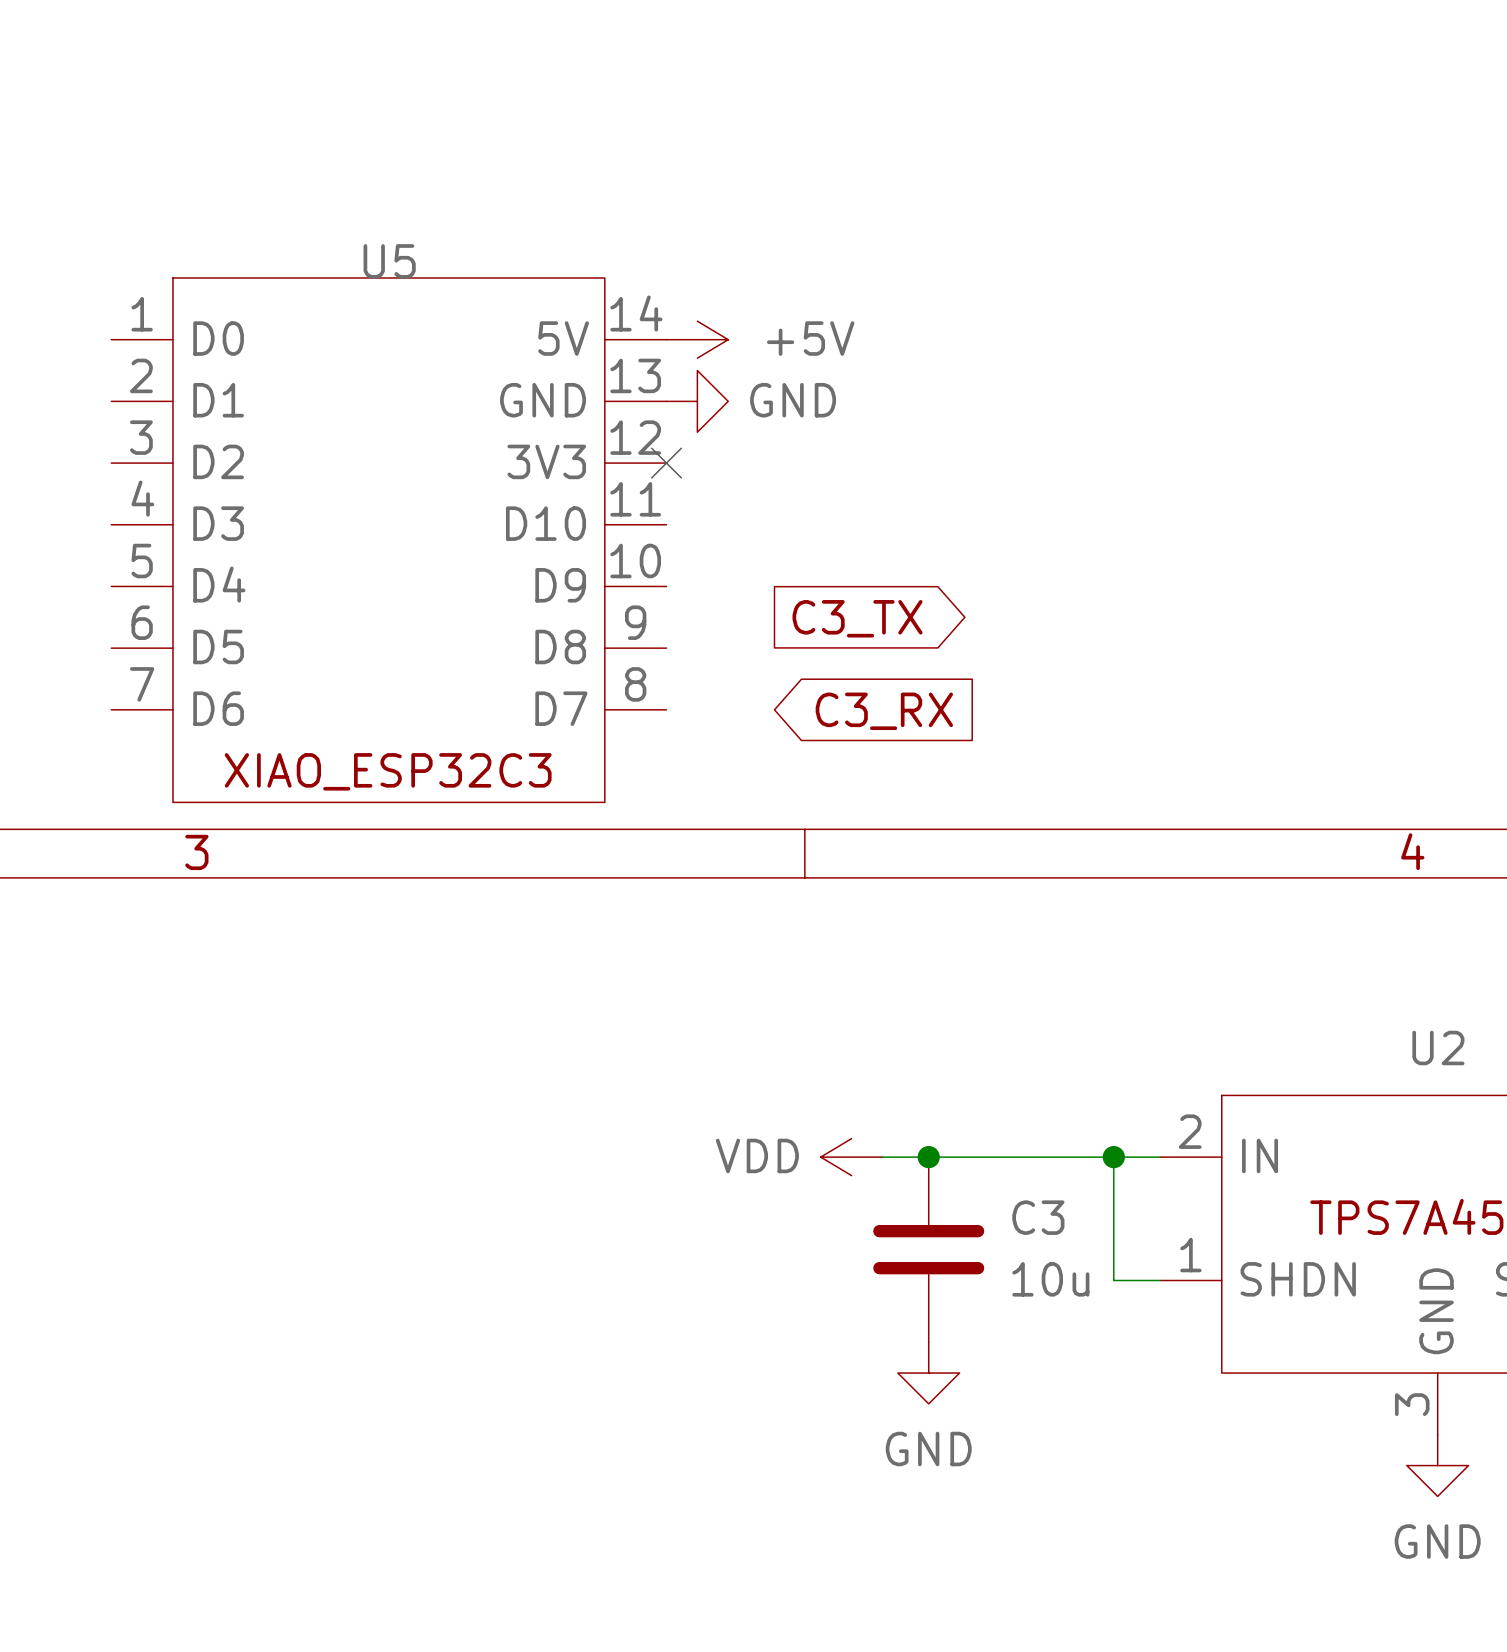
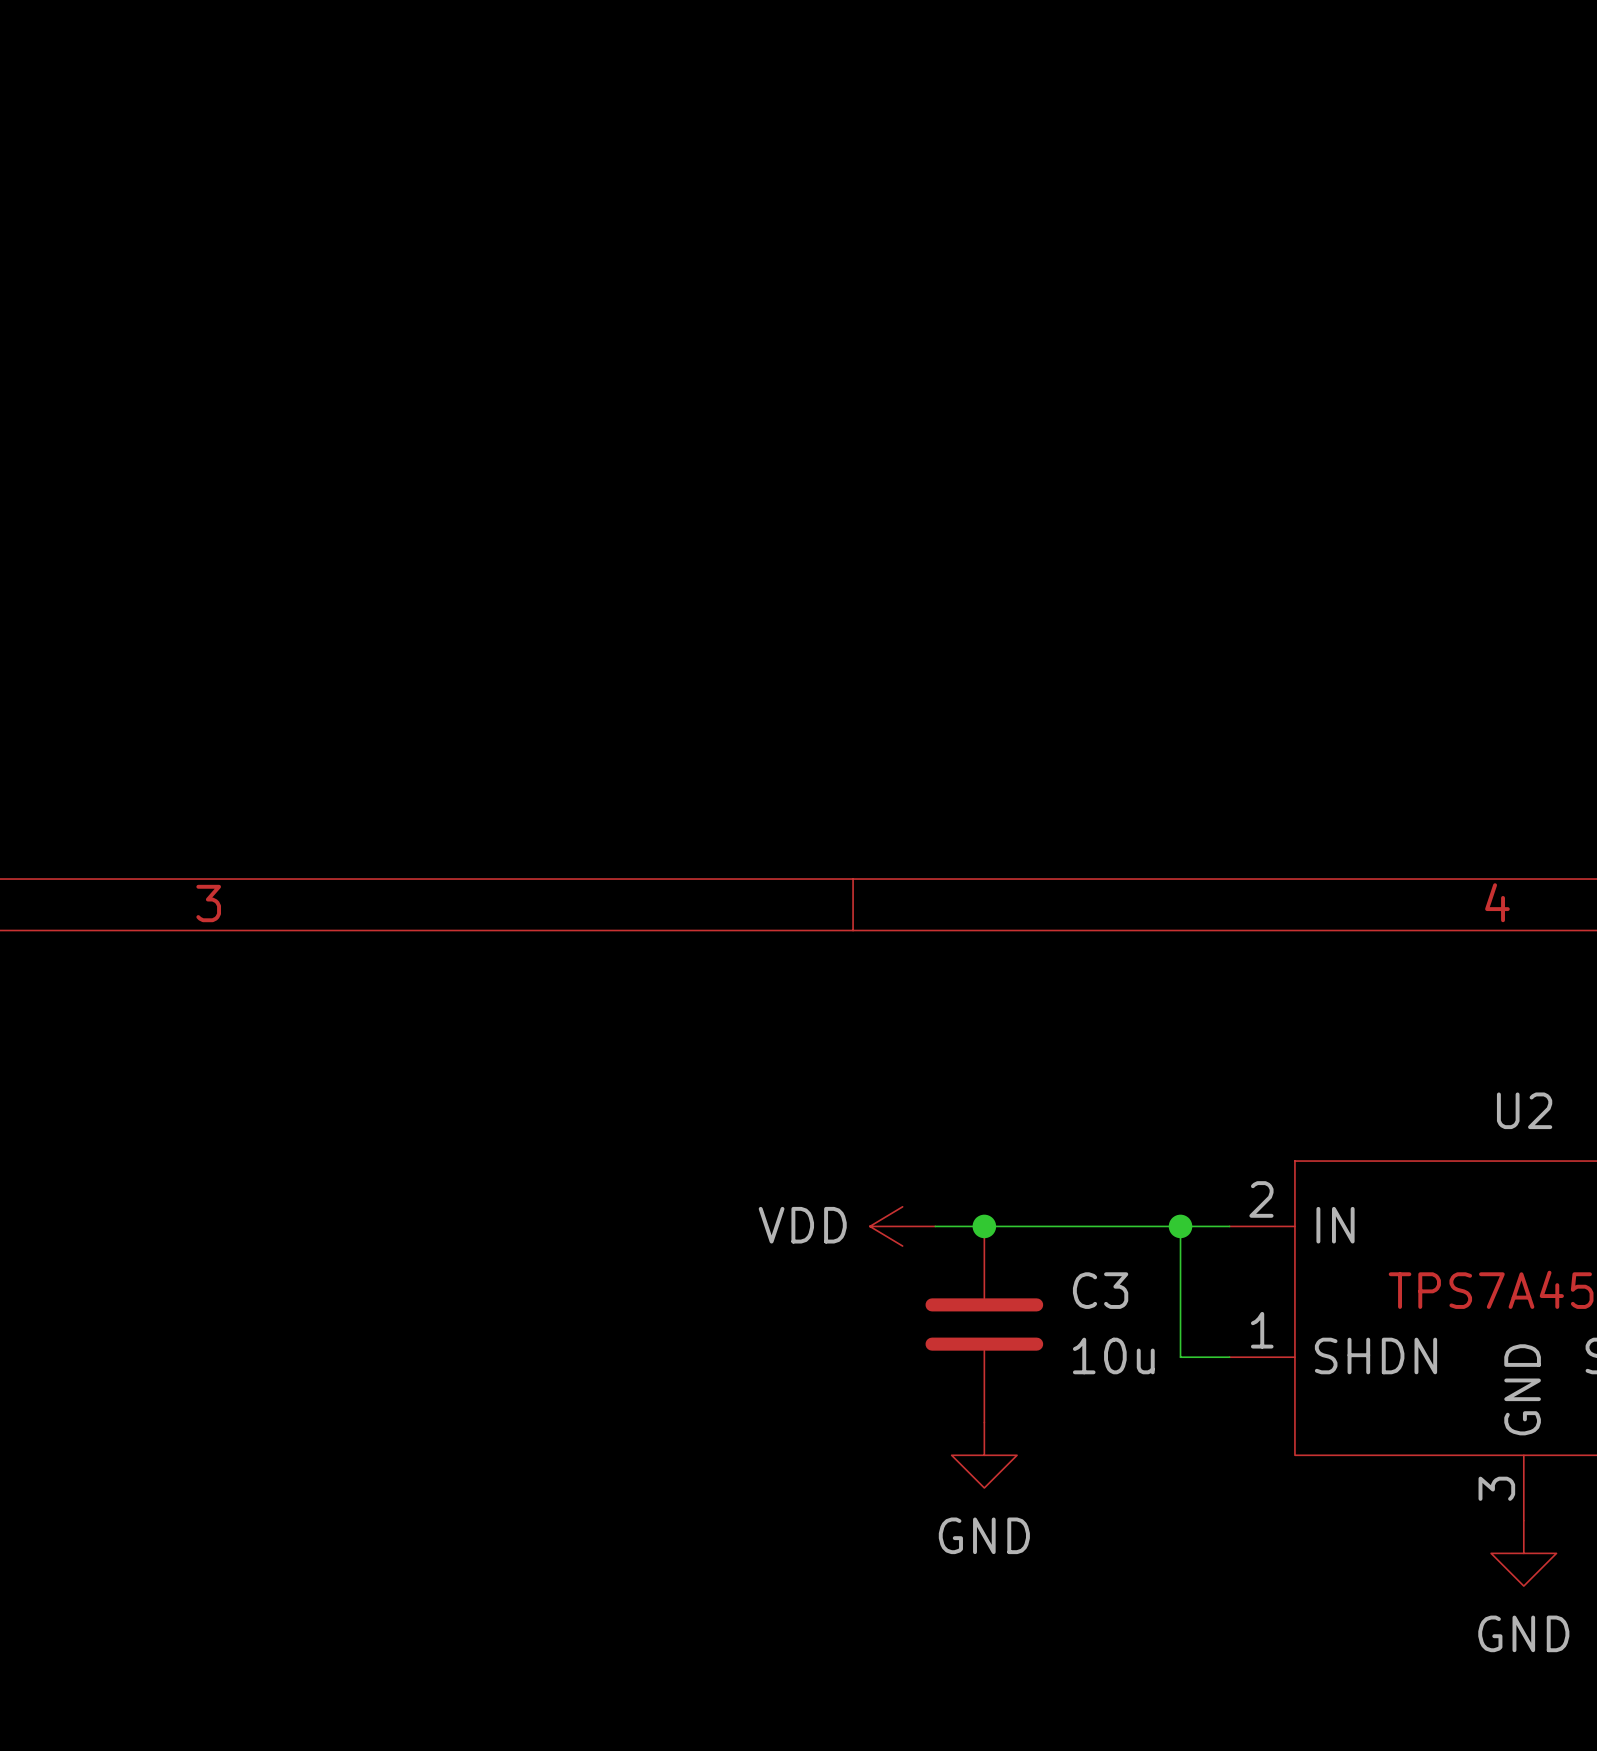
power symbol: +5V (697, 339) -> none
power symbol: GND (697, 401) -> none
no-connect mark: (666, 463) -> none
U5: (388, 540) -> none
global label: C3_TX (857, 618) -> none
global label: C3_RX (884, 711) -> none

